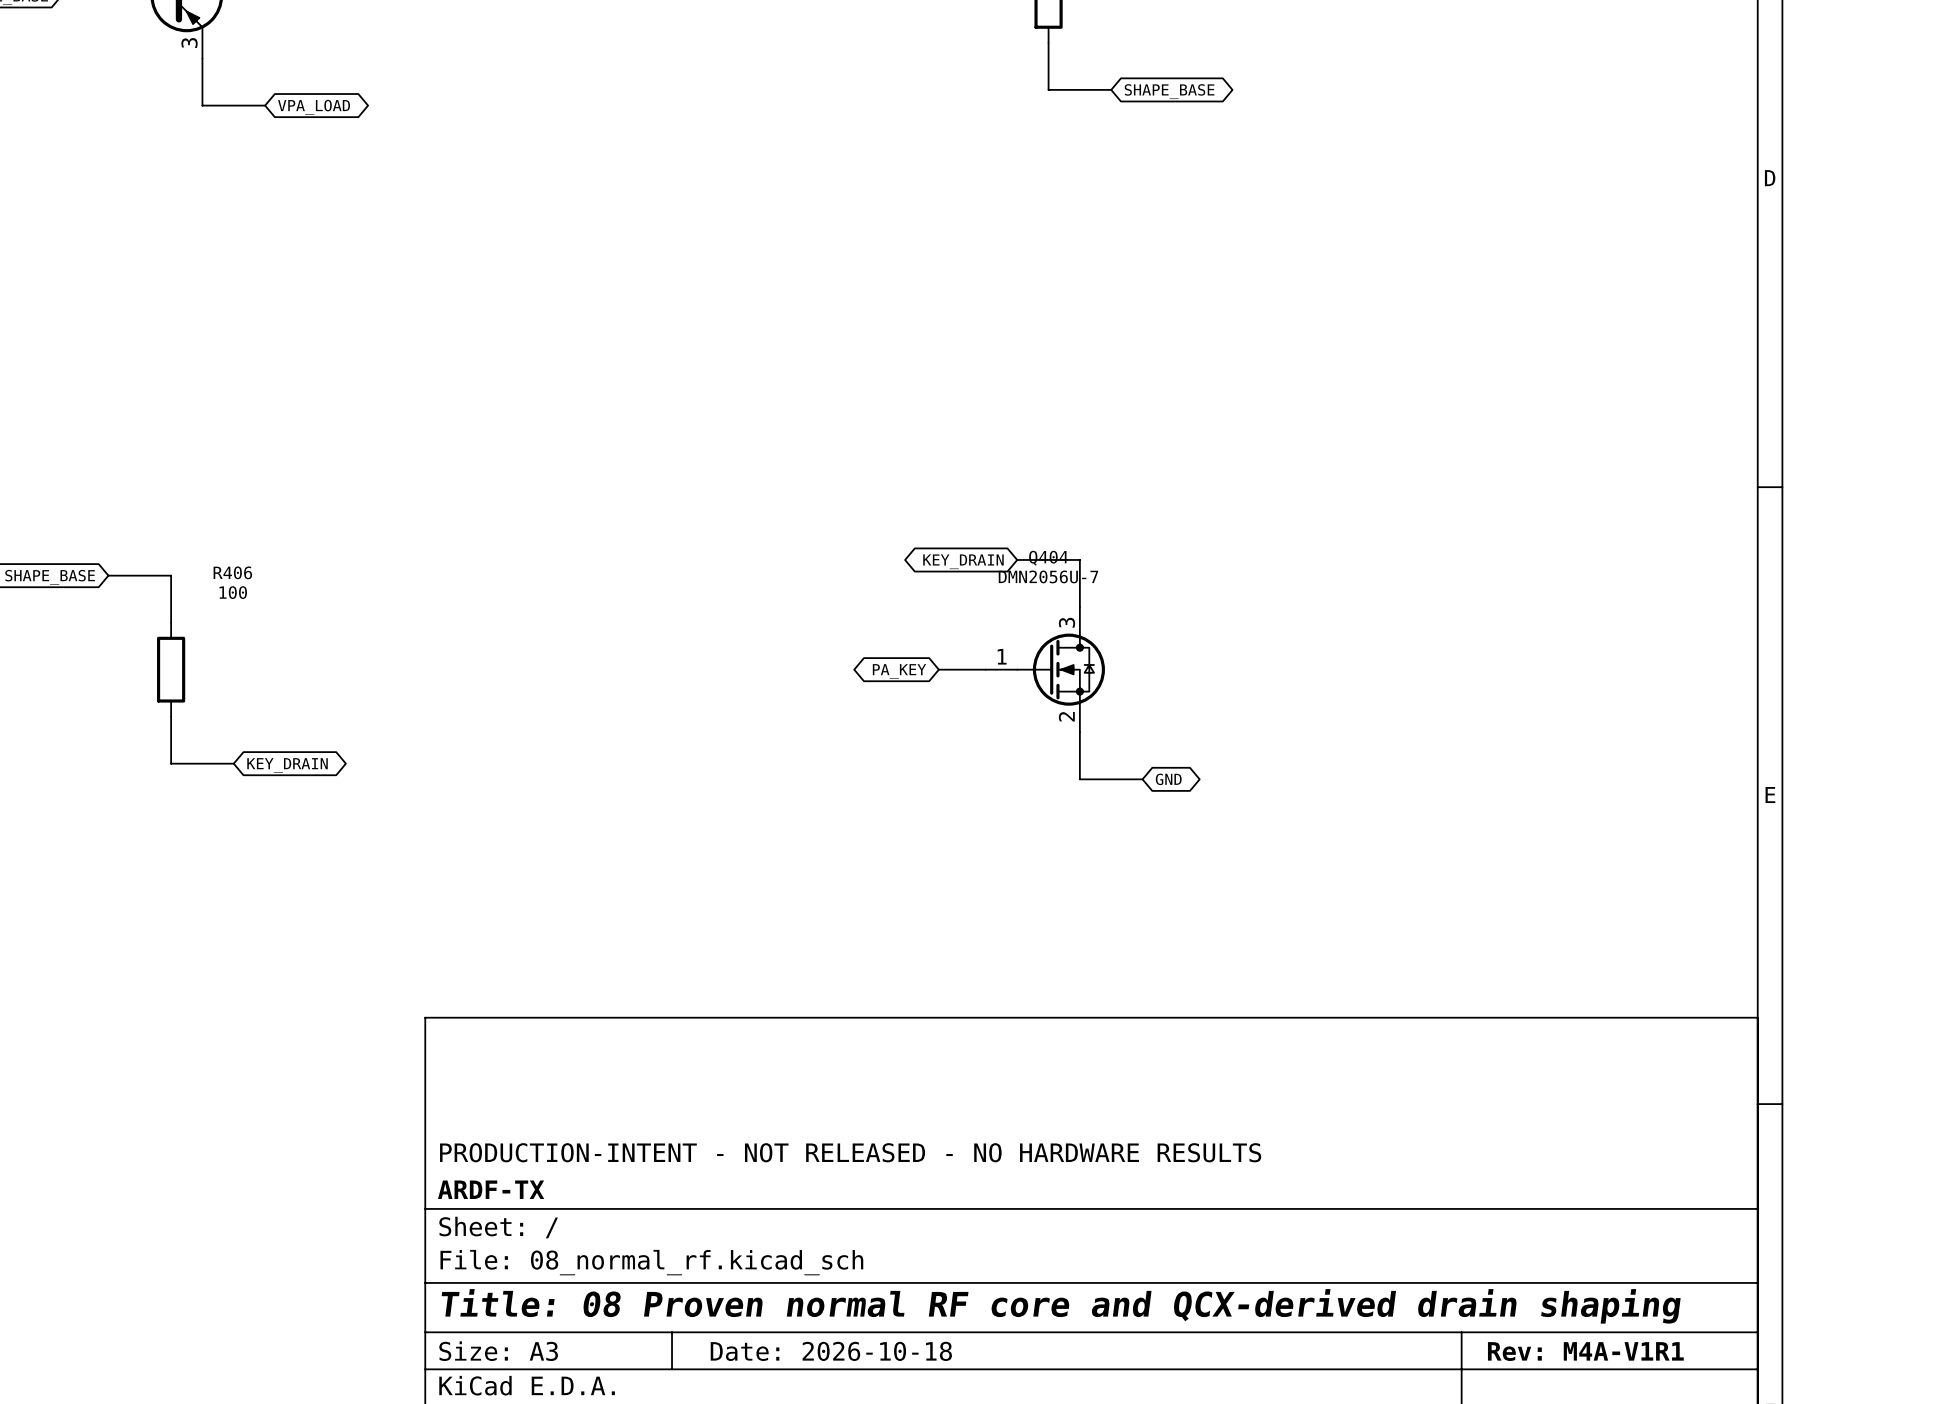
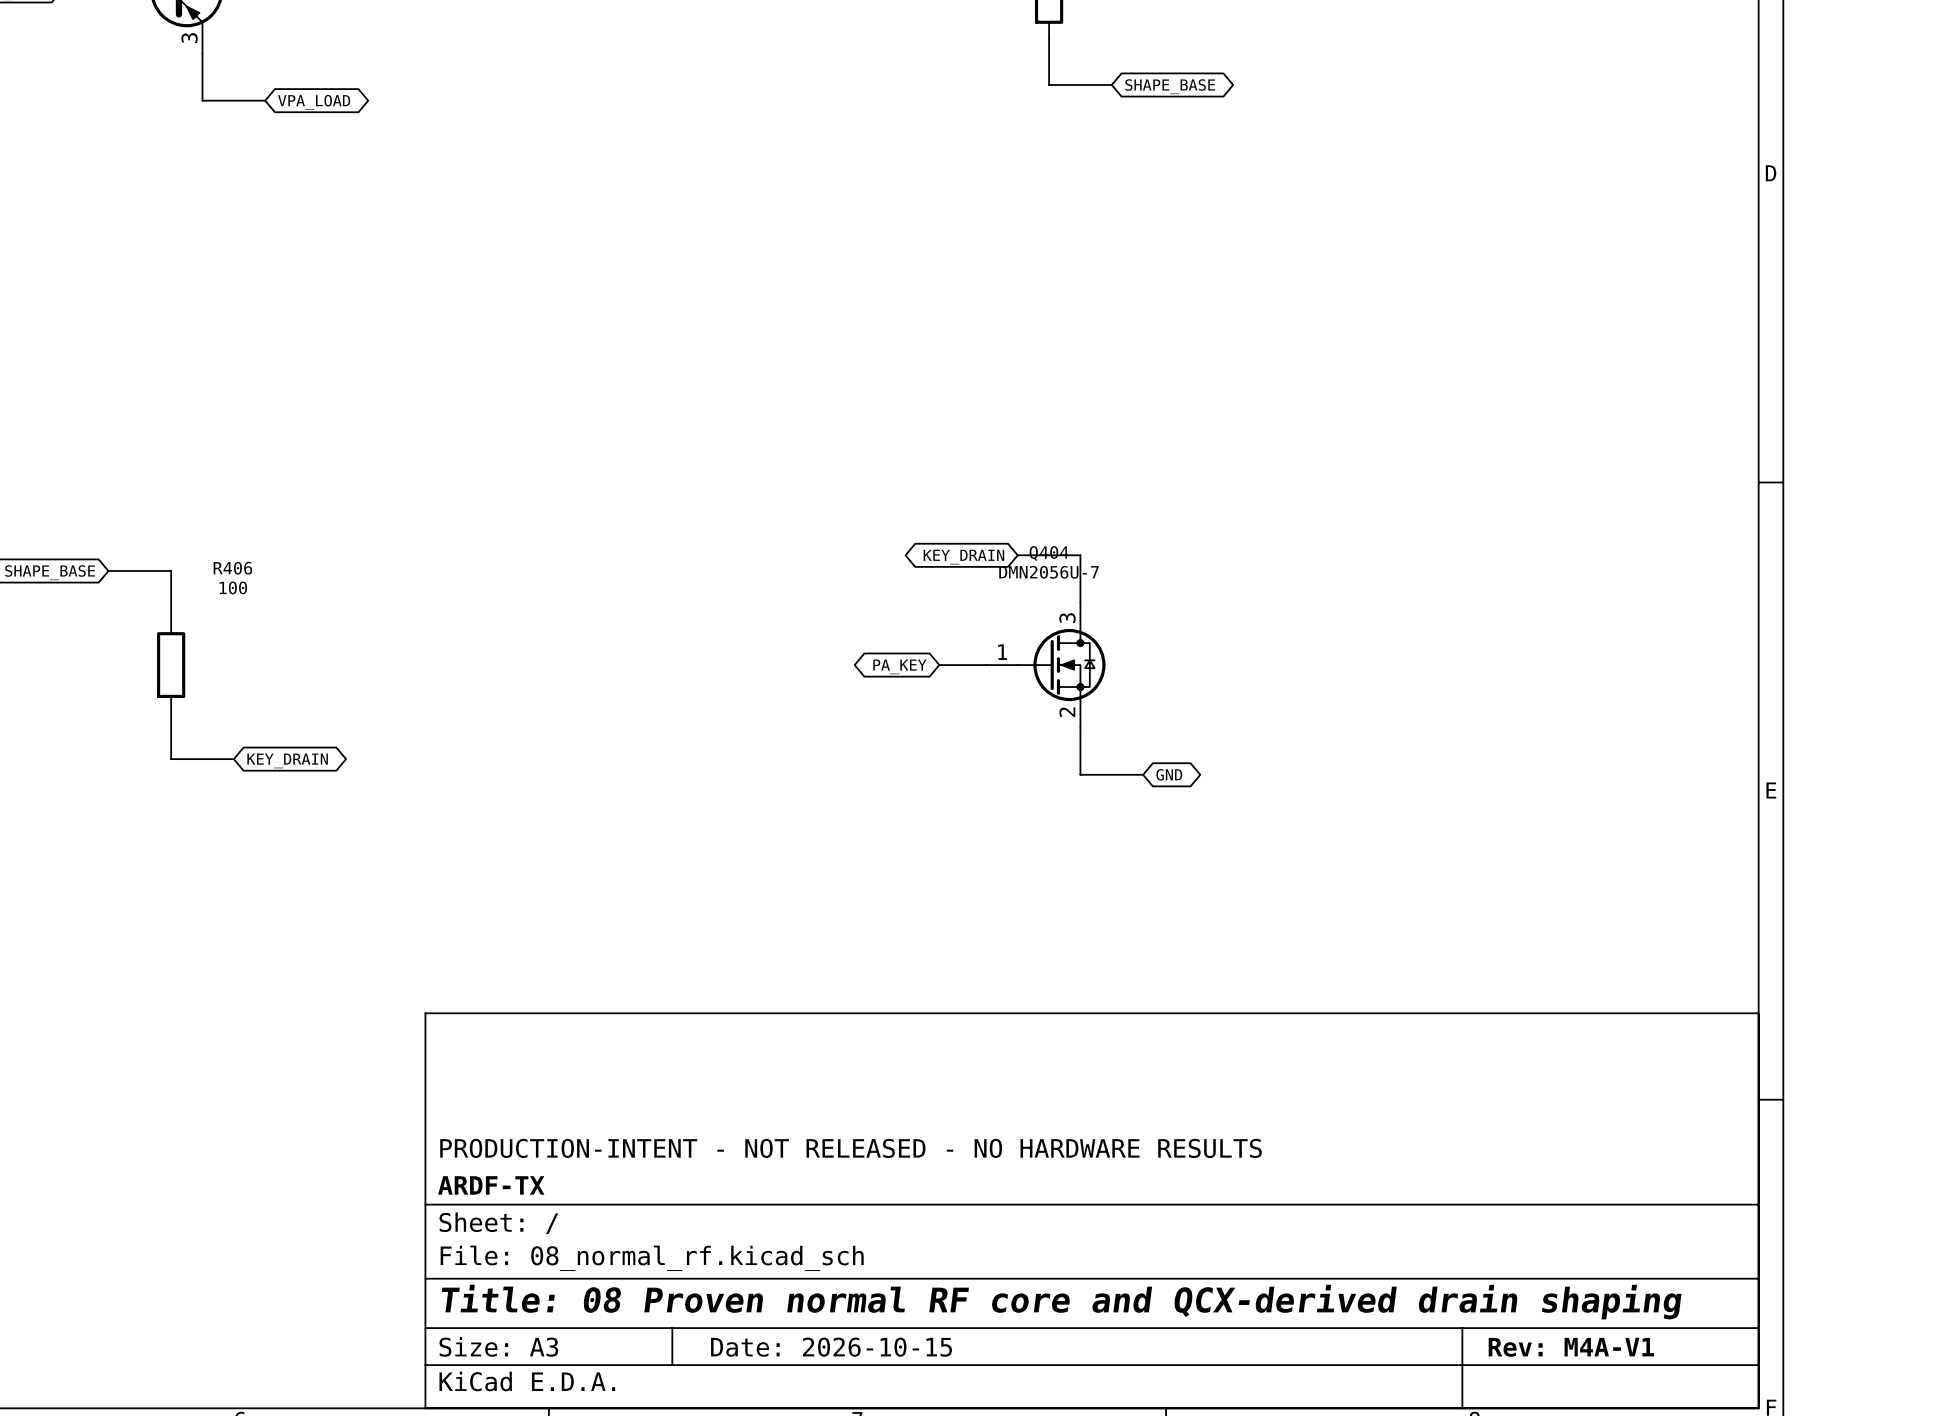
title block: Date: 2026-10-18 (831, 1351) -> Date: 2026-10-15 (831, 1347)
title block: Rev: M4A-V1R1 (1585, 1351) -> Rev: M4A-V1 (1571, 1347)

